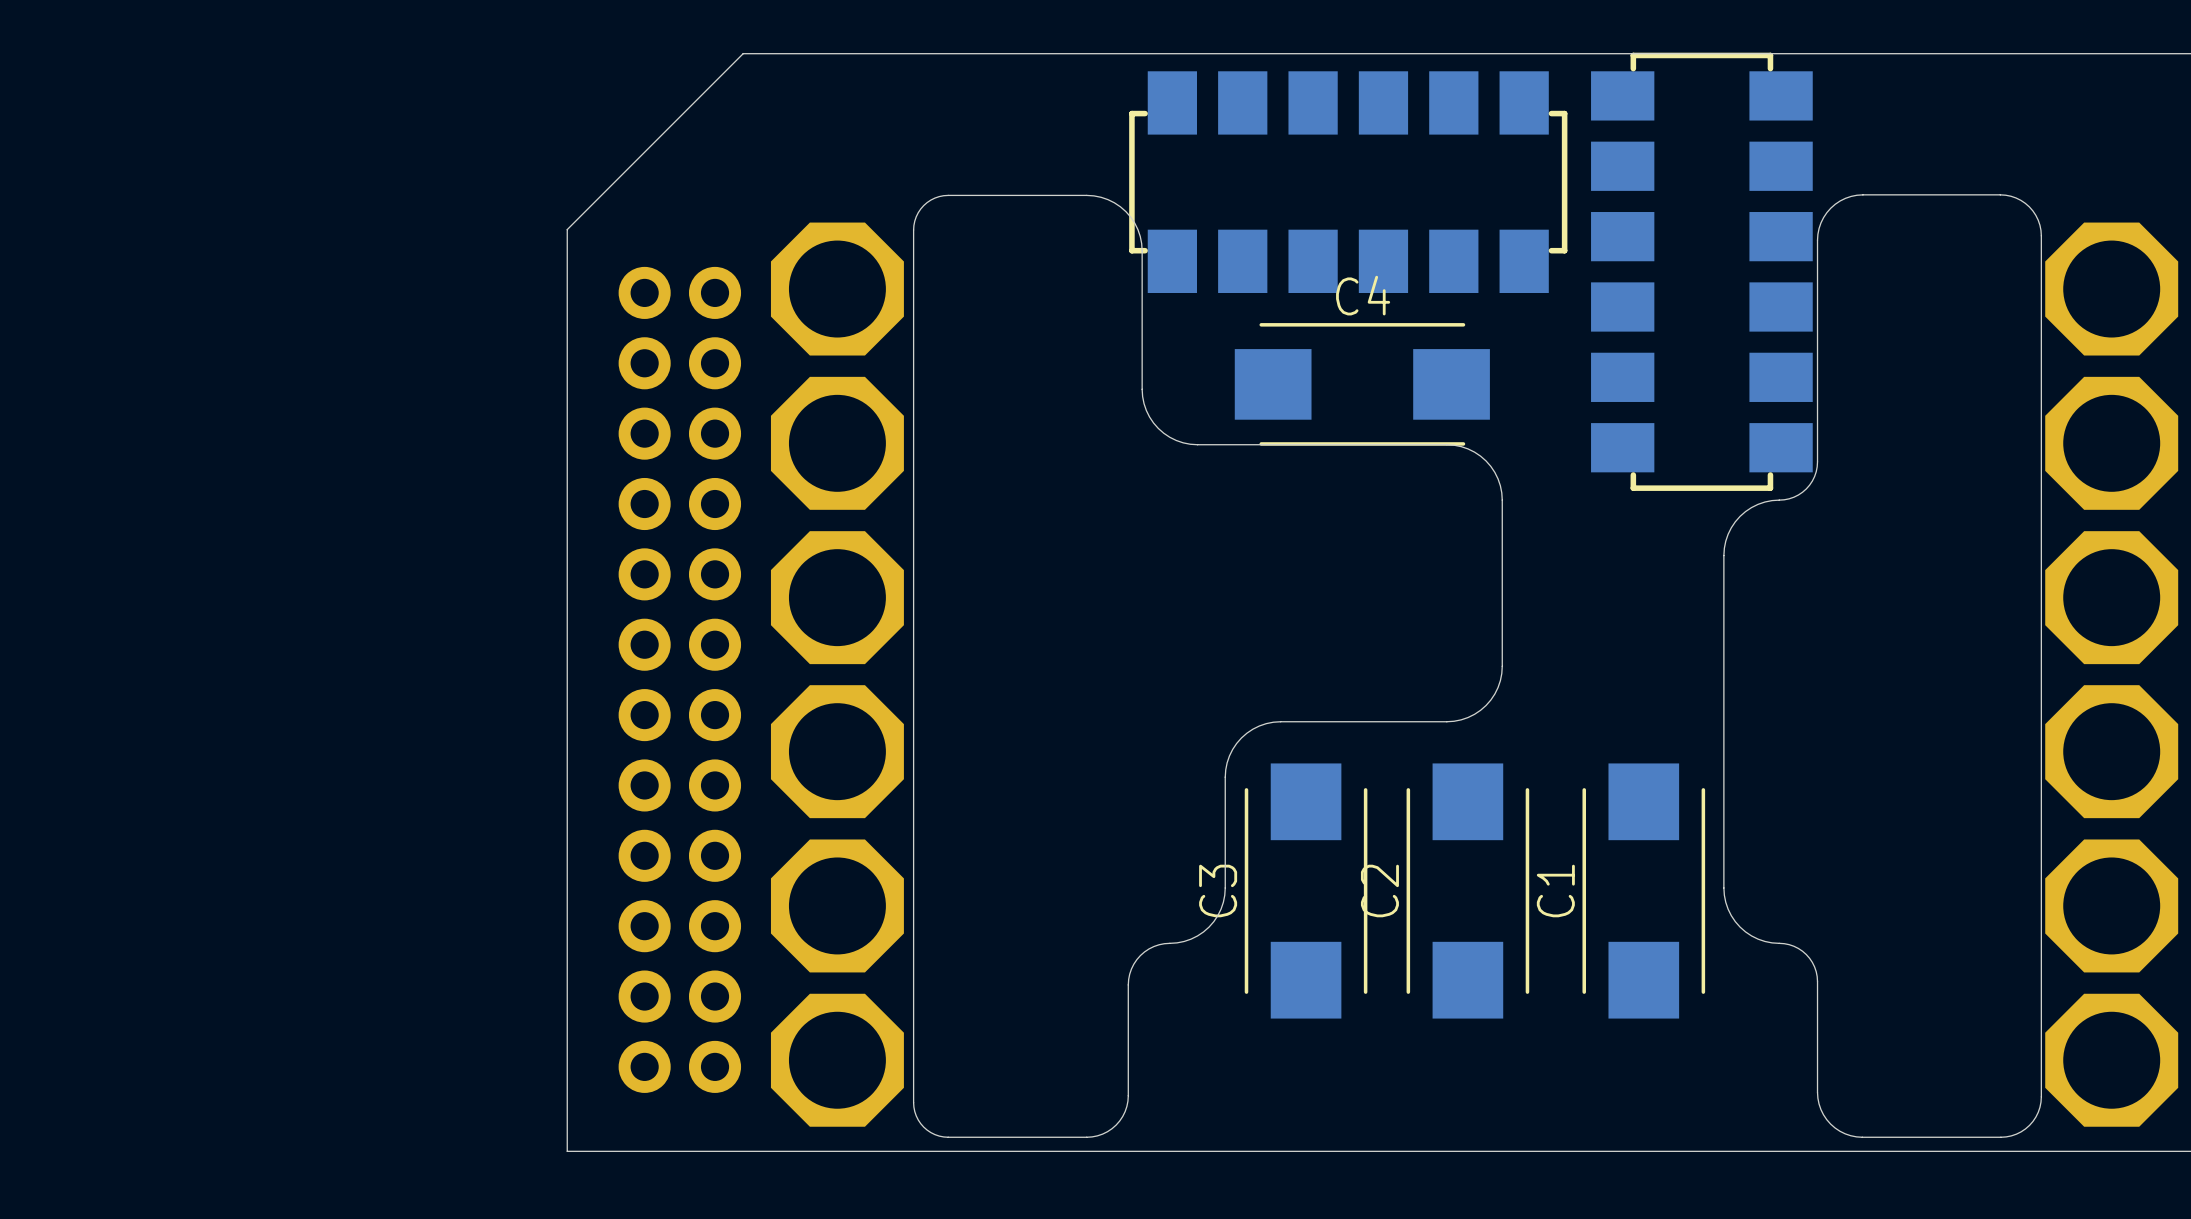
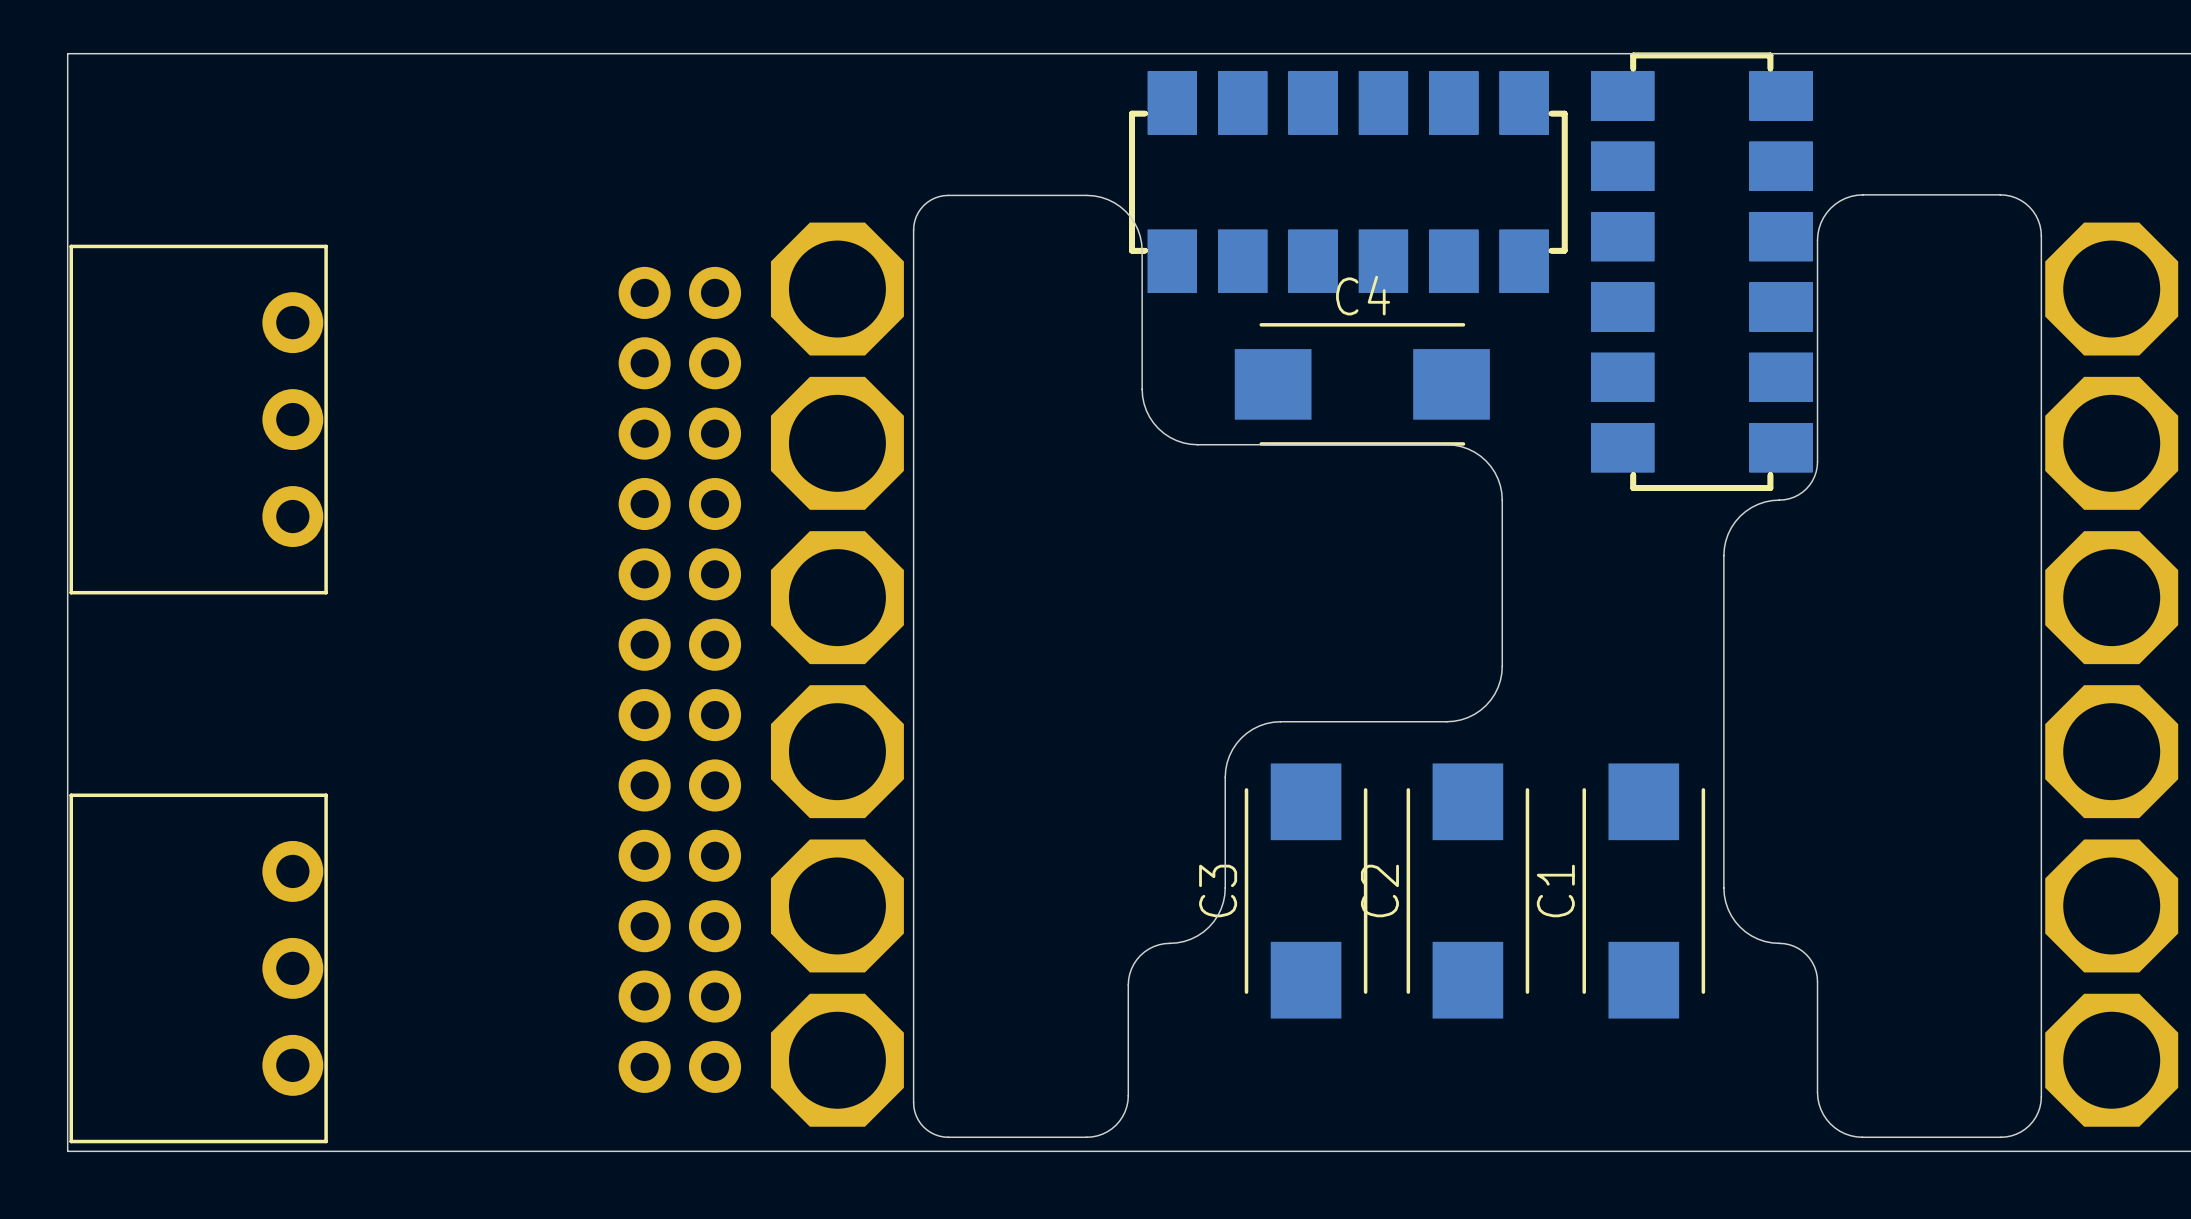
board edge: (743, 53) (567, 229) (567, 1151) -> (743, 53) (67, 53) (67, 1151) (567, 1151)
part: none -> (1470, 271)
part: none -> (198, 419)
part: none -> (198, 968)

